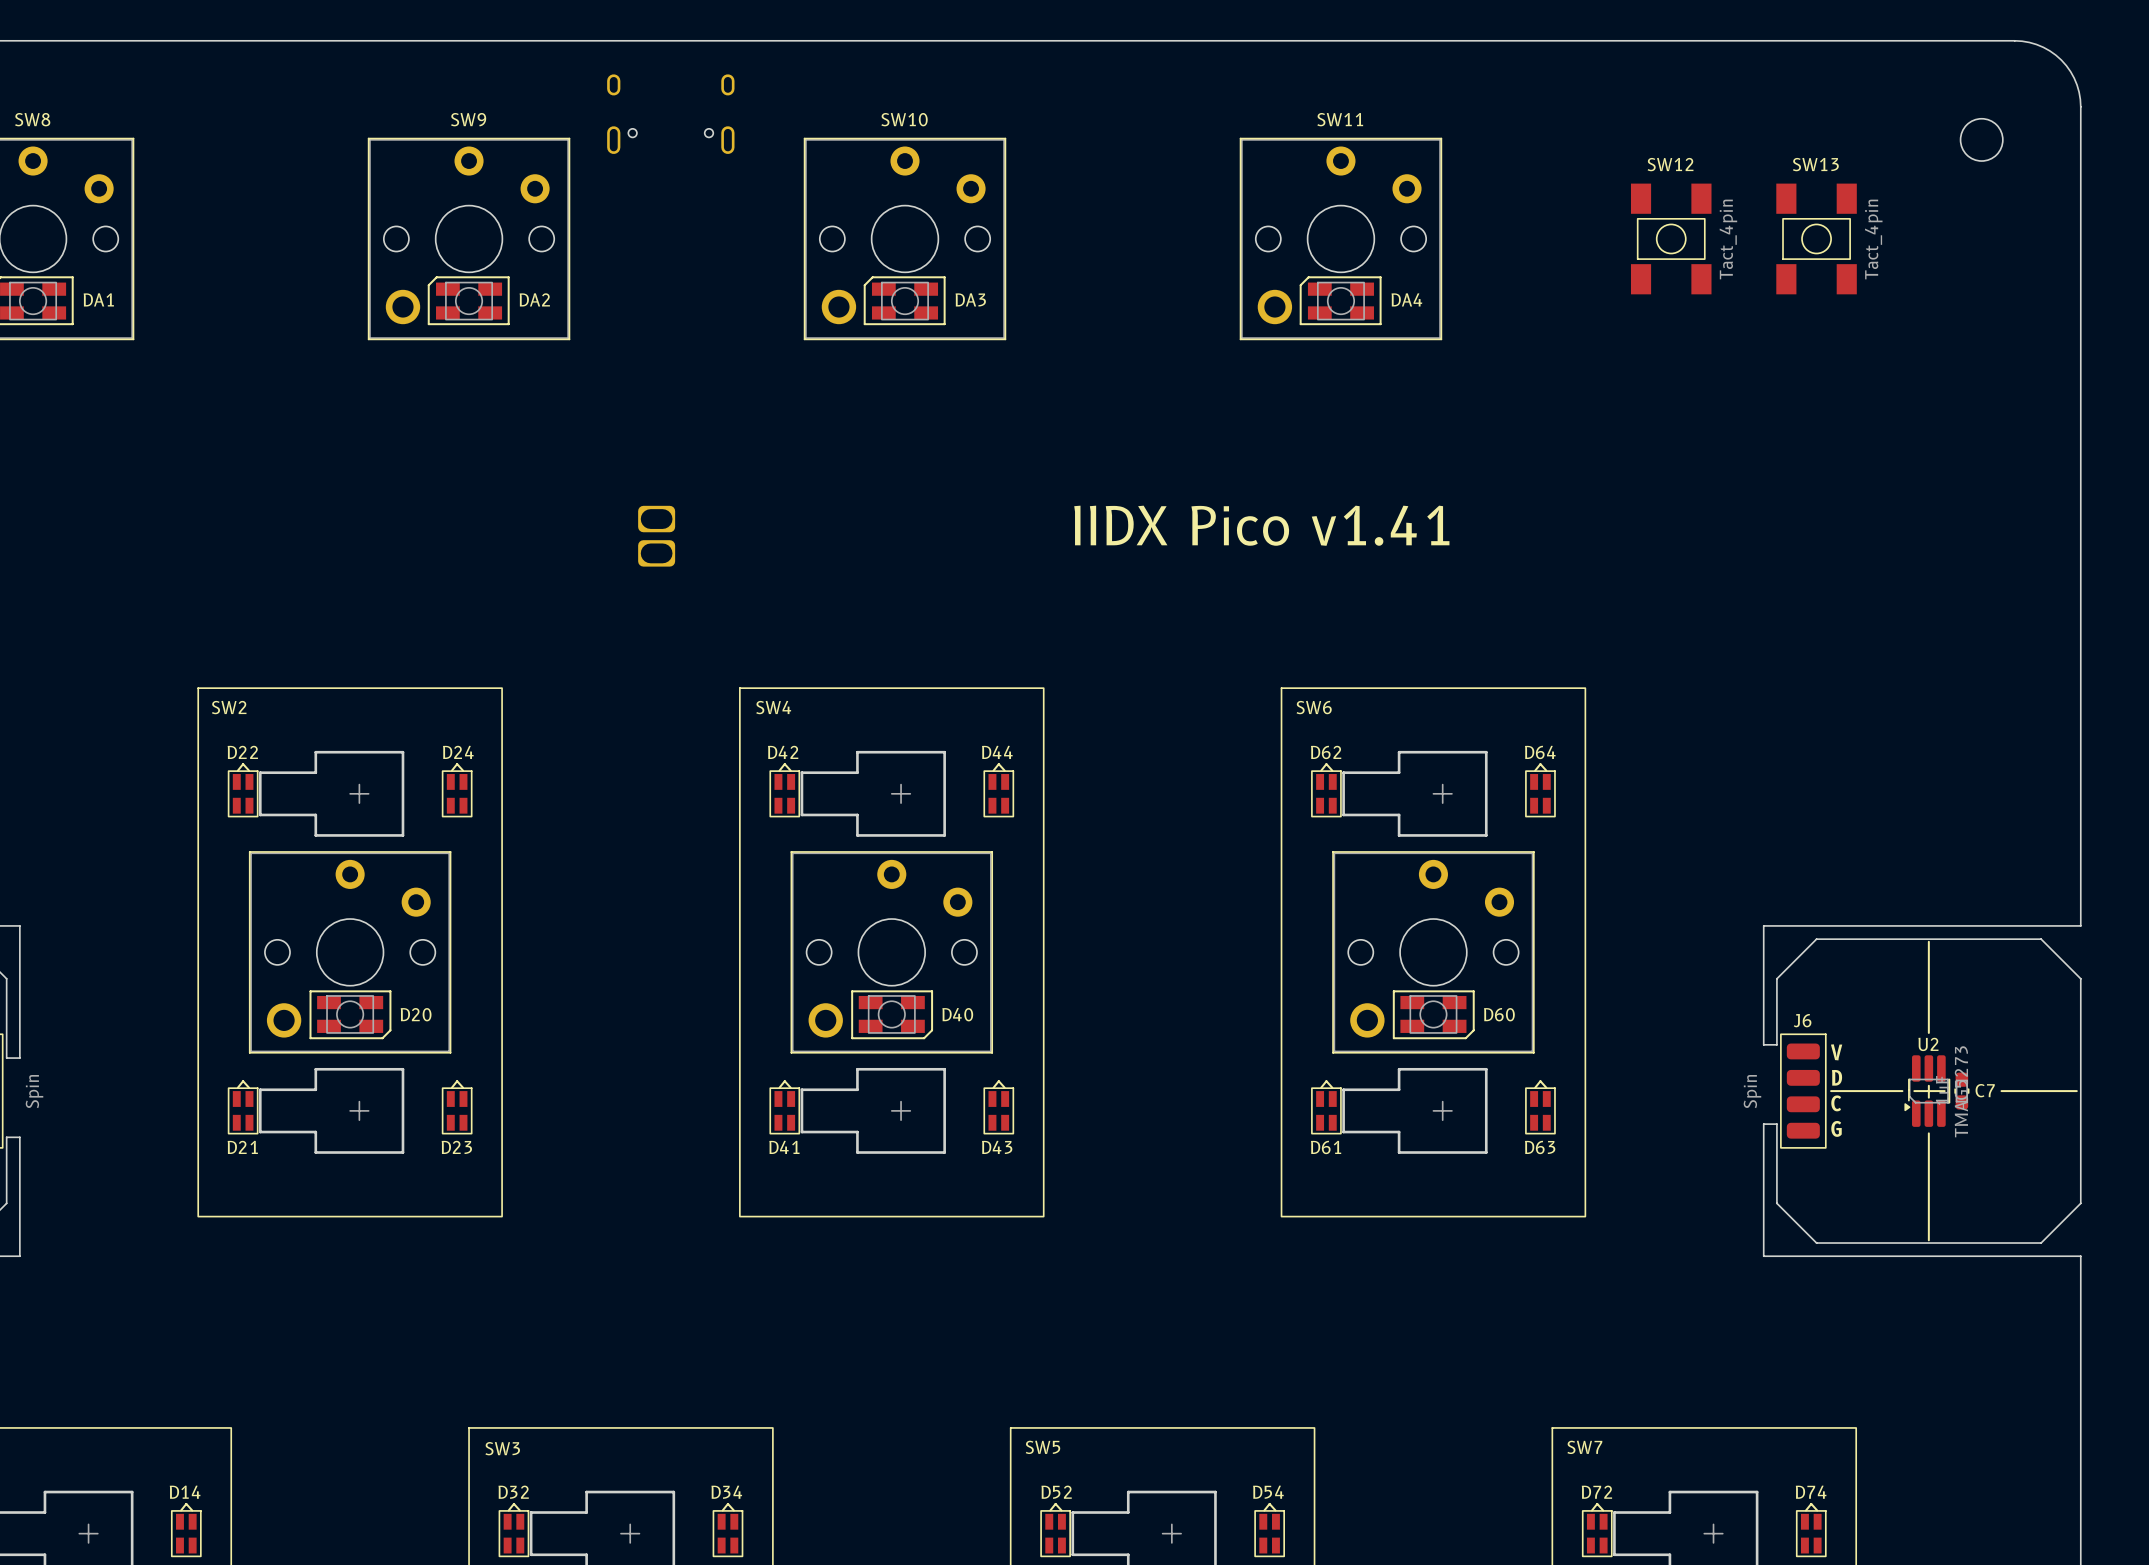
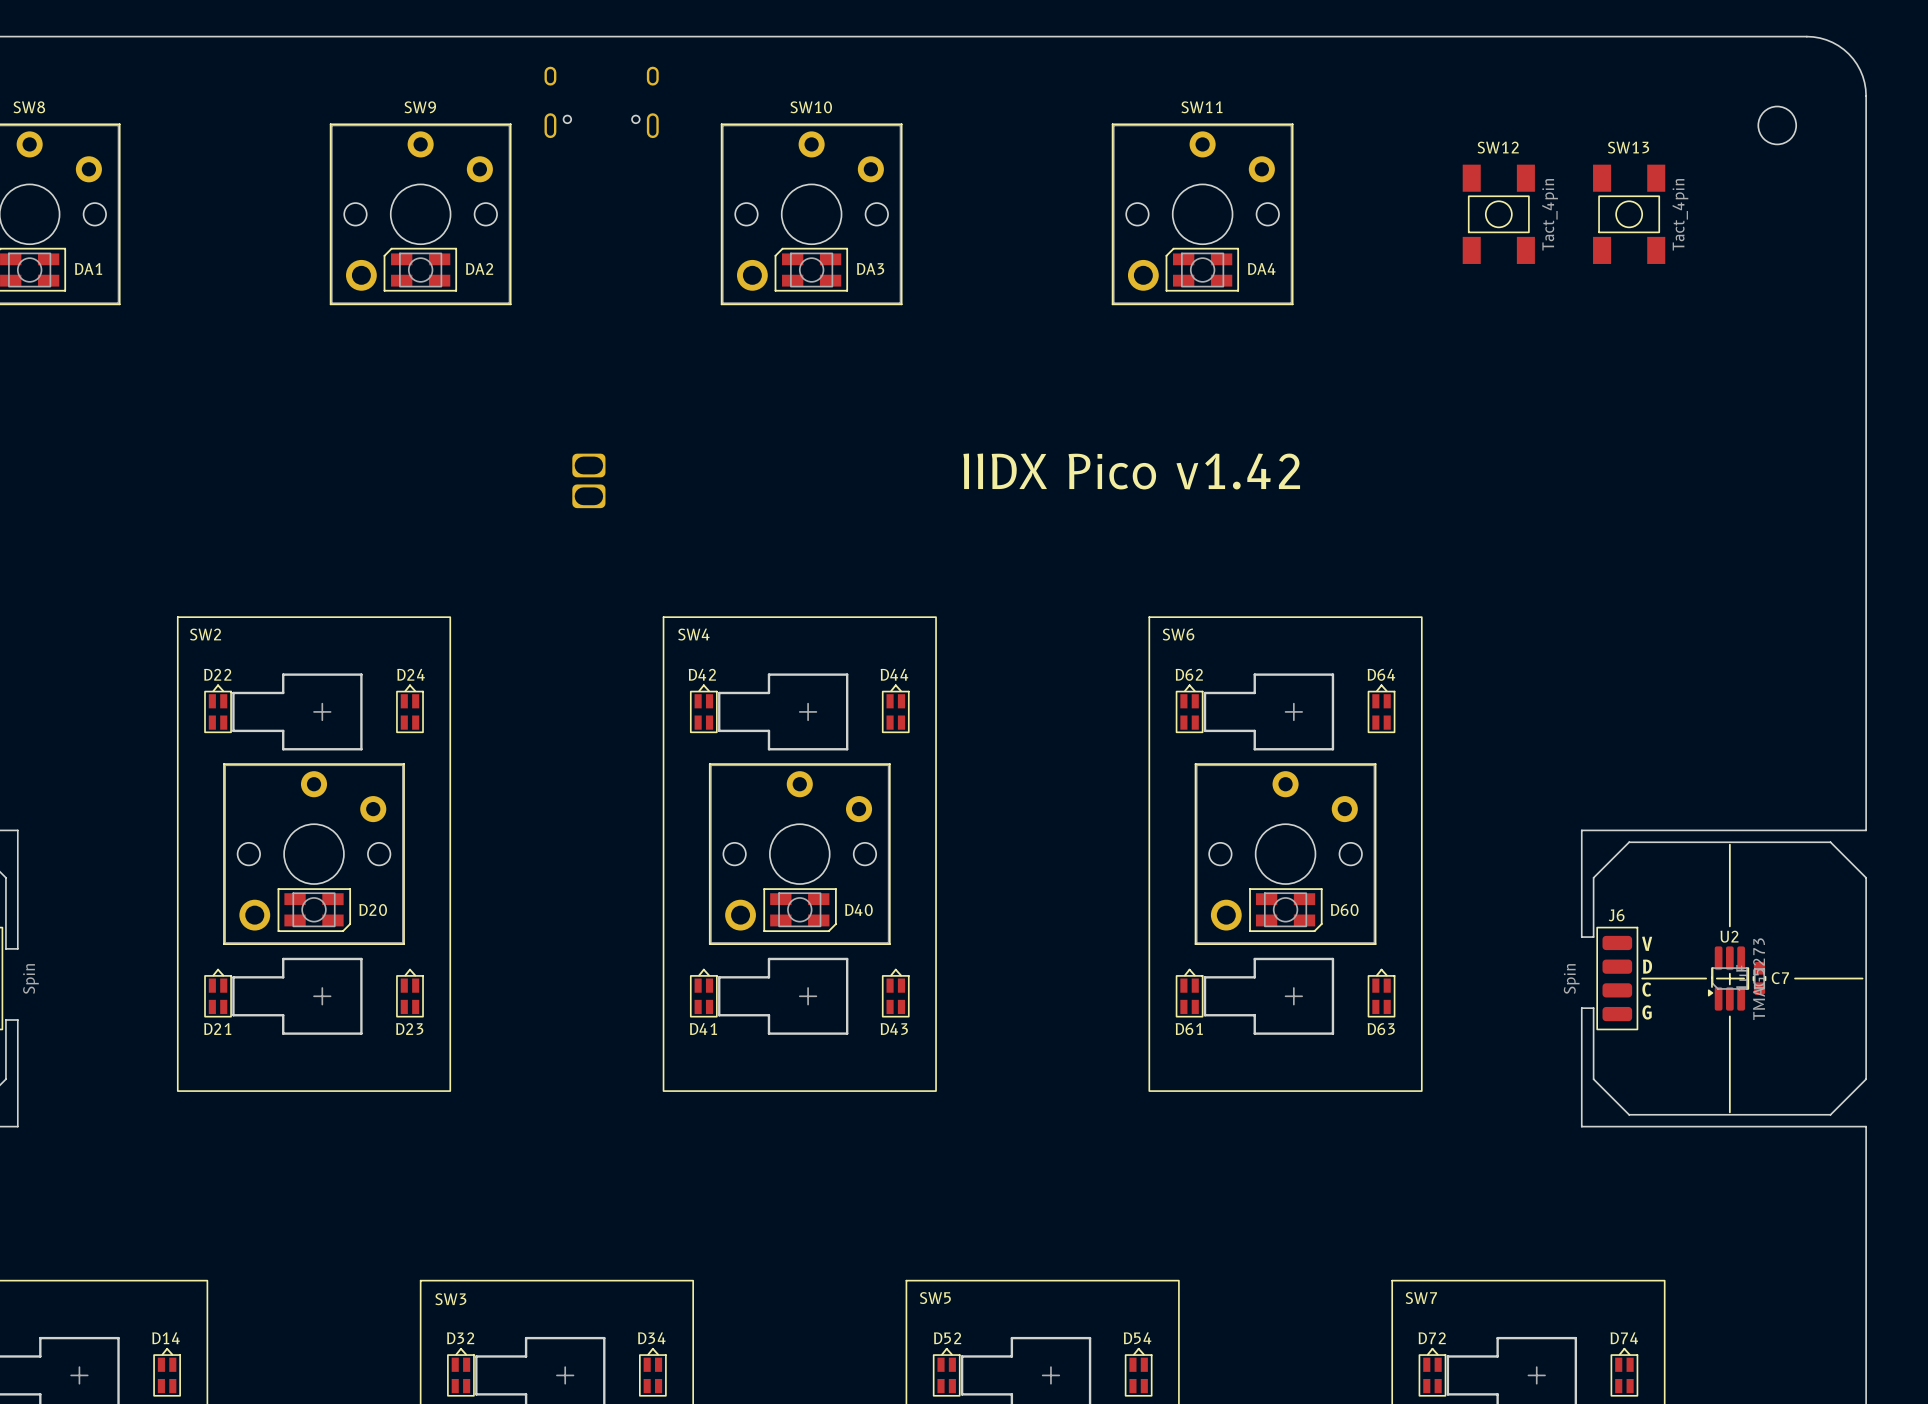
text: IIDX Pico v1.41 (1261, 525) -> IIDX Pico v1.42 (1131, 471)

